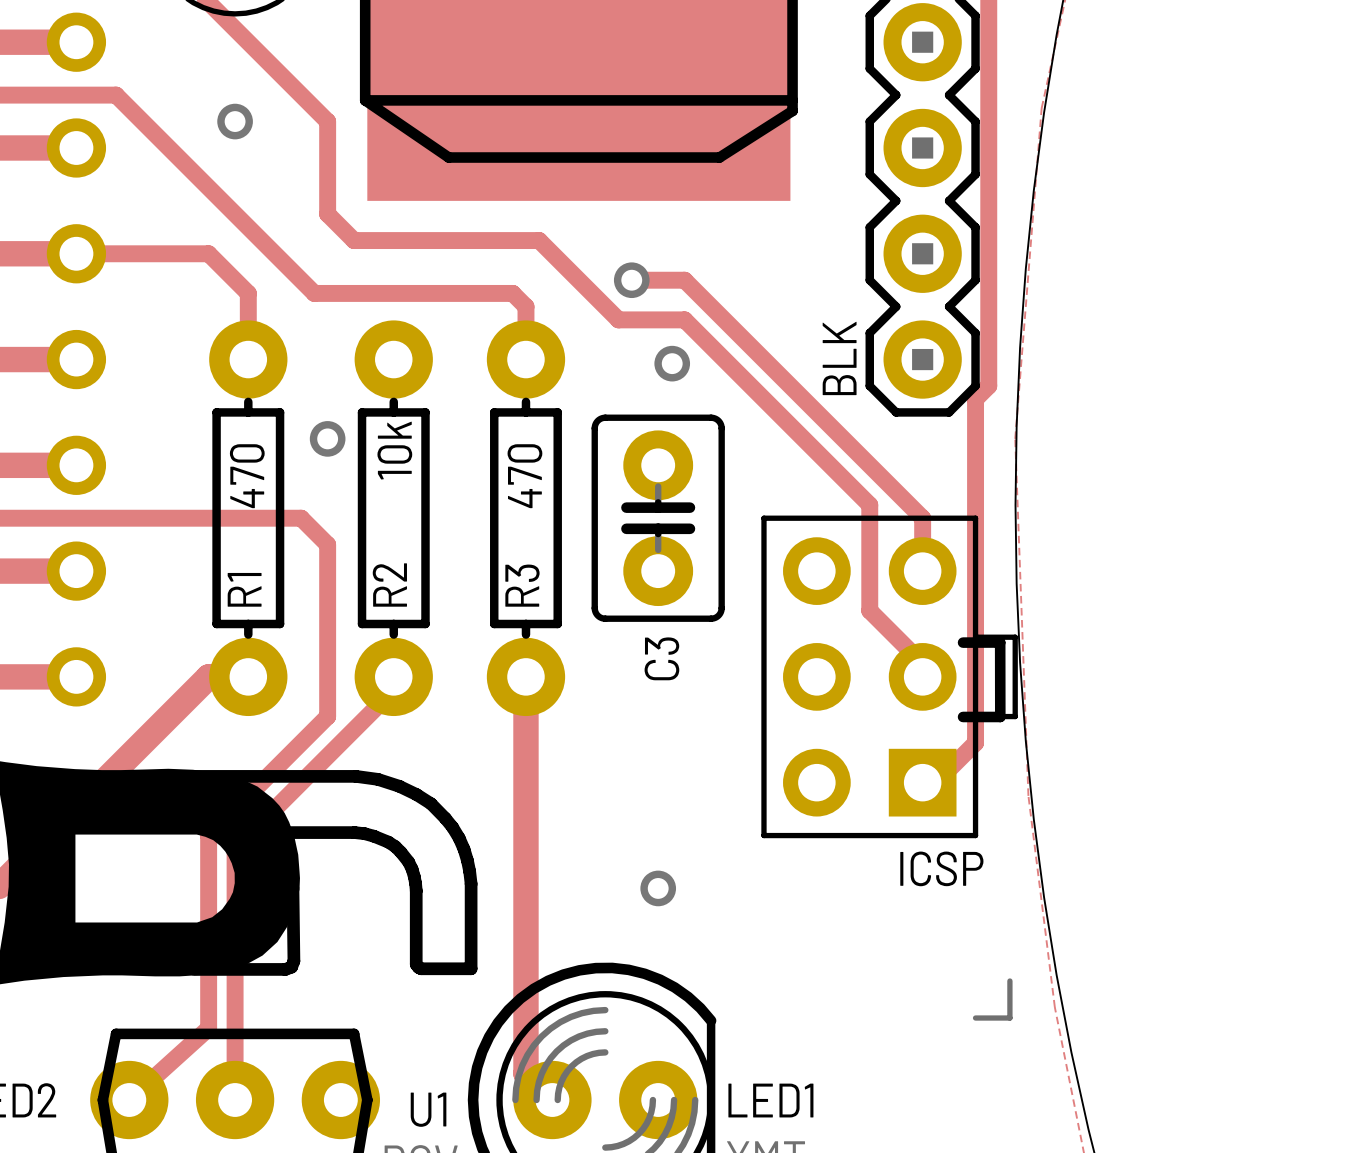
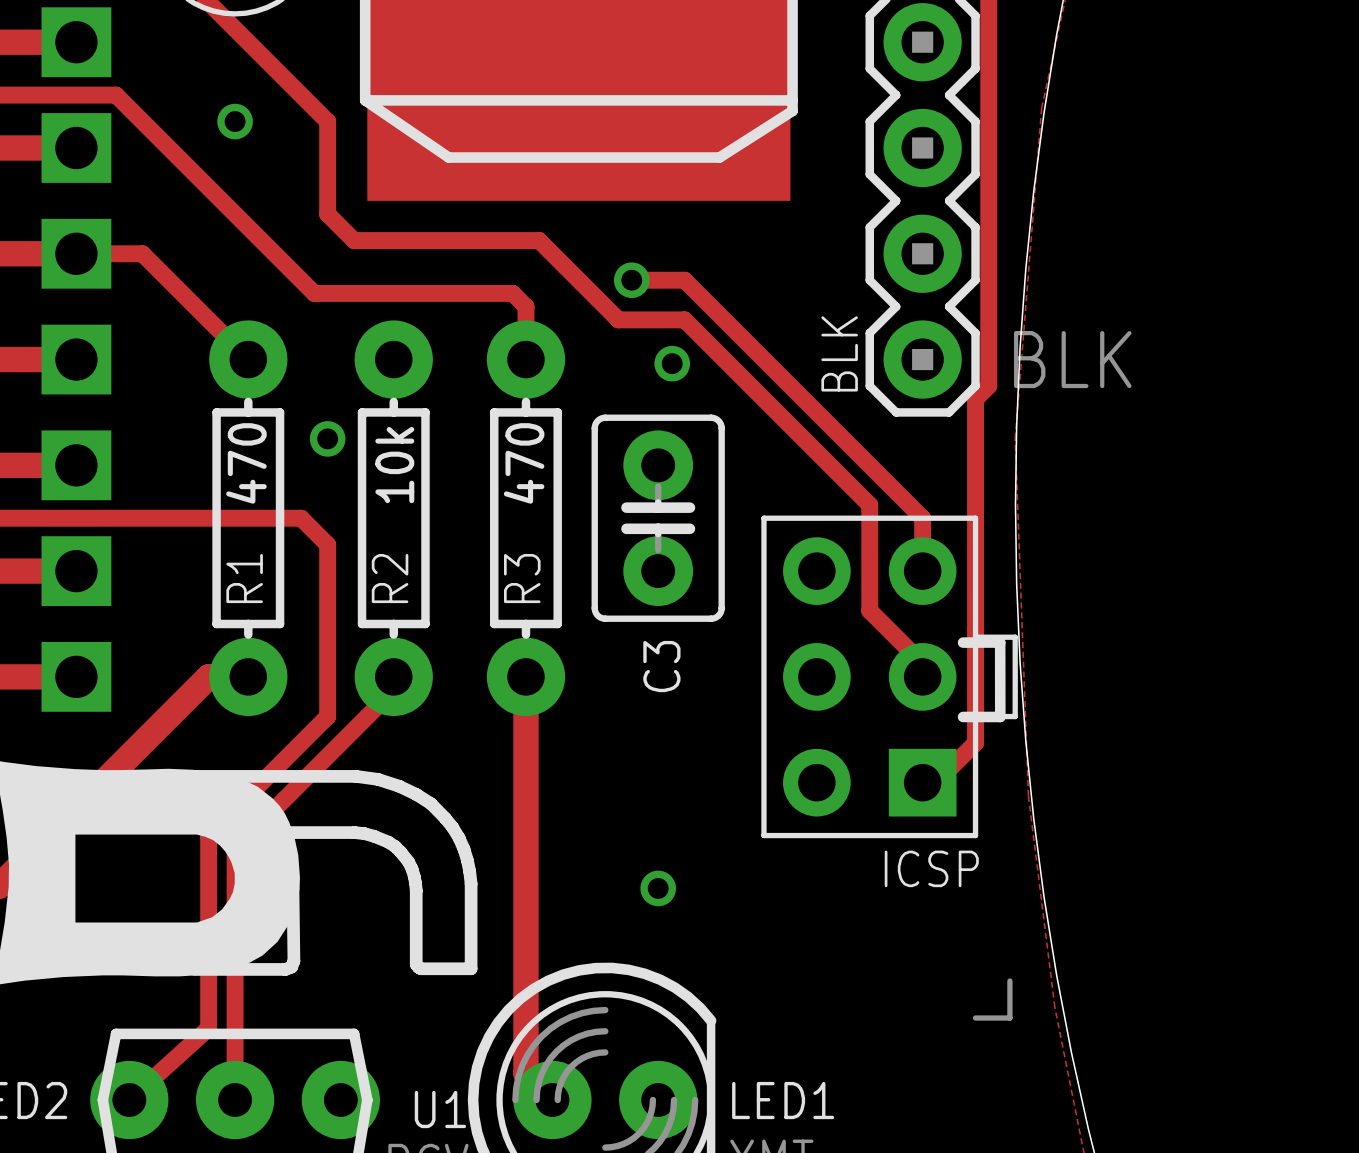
part footprint: [46, 12, 107, 72] -> [41, 7, 112, 78]
part footprint: [46, 118, 107, 178] -> [41, 113, 112, 183]
part footprint: [46, 224, 107, 284] -> [41, 218, 112, 289]
track: (142, 253) (208, 253) (248, 293) (248, 359) -> (142, 253) (248, 359)
part footprint: [46, 329, 107, 390] -> [41, 324, 112, 395]
part text: none -> BLK (1072, 359)
part footprint: [46, 435, 107, 495] -> [41, 430, 112, 501]
part footprint: [46, 541, 107, 601] -> [41, 536, 112, 607]
part footprint: [46, 647, 107, 707] -> [41, 641, 112, 712]

